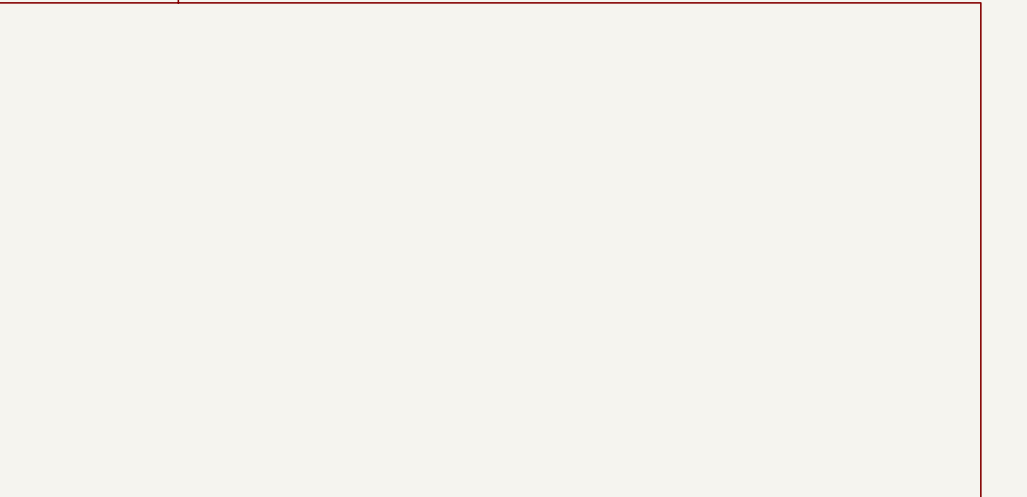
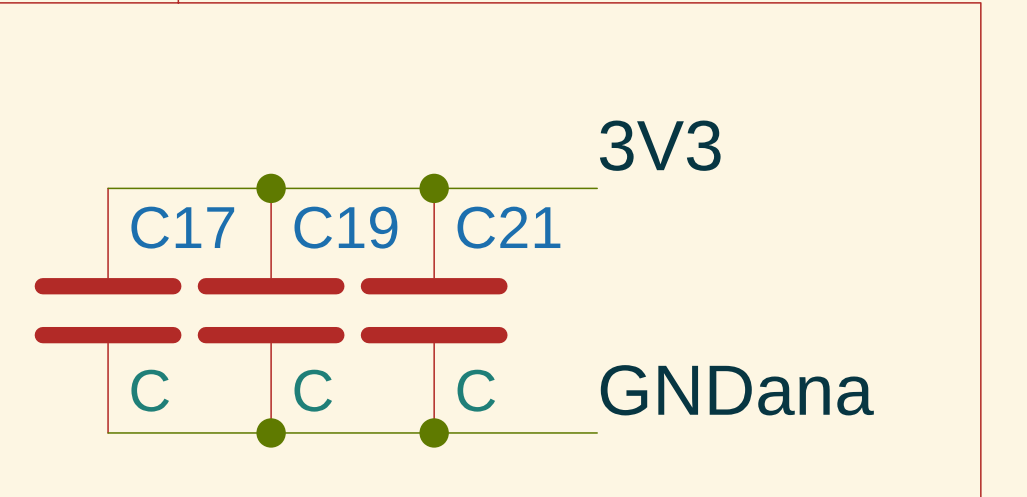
label: none -> 3V3 (660, 145)
wire: none -> (108, 188) (597, 188)
junction: none -> (271, 188)
junction: none -> (434, 188)
C17: none -> C (108, 310)
C19: none -> C (271, 310)
C21: none -> C (434, 310)
label: none -> GNDana (737, 390)
wire: none -> (108, 432) (597, 432)
junction: none -> (271, 432)
junction: none -> (434, 432)

